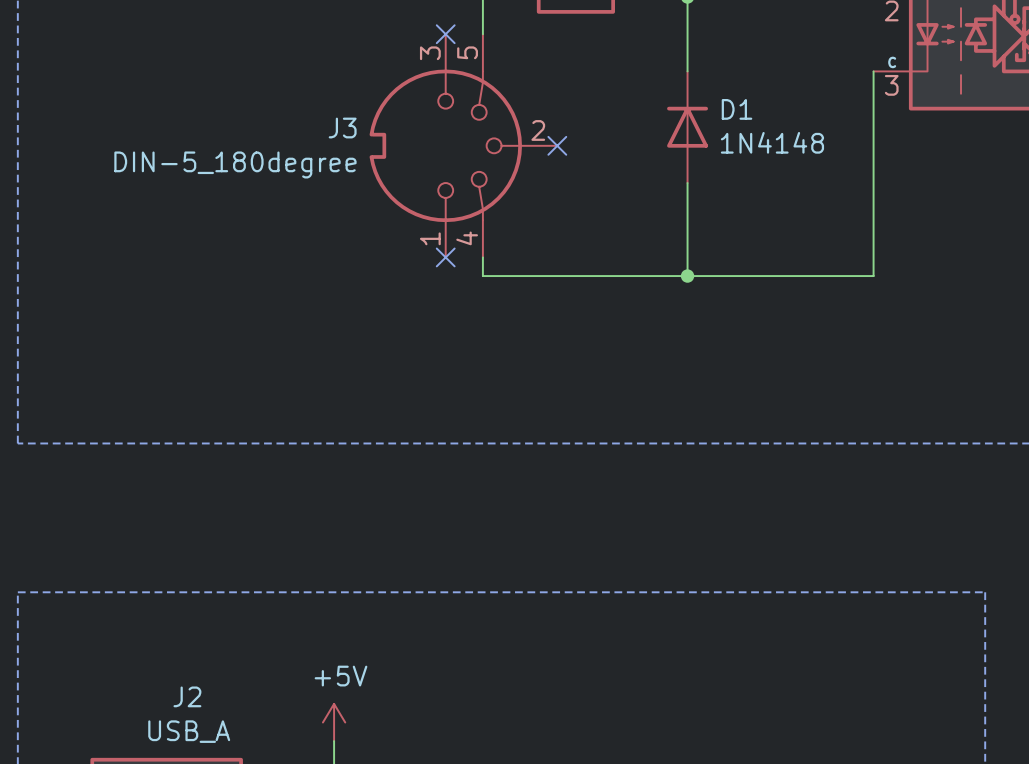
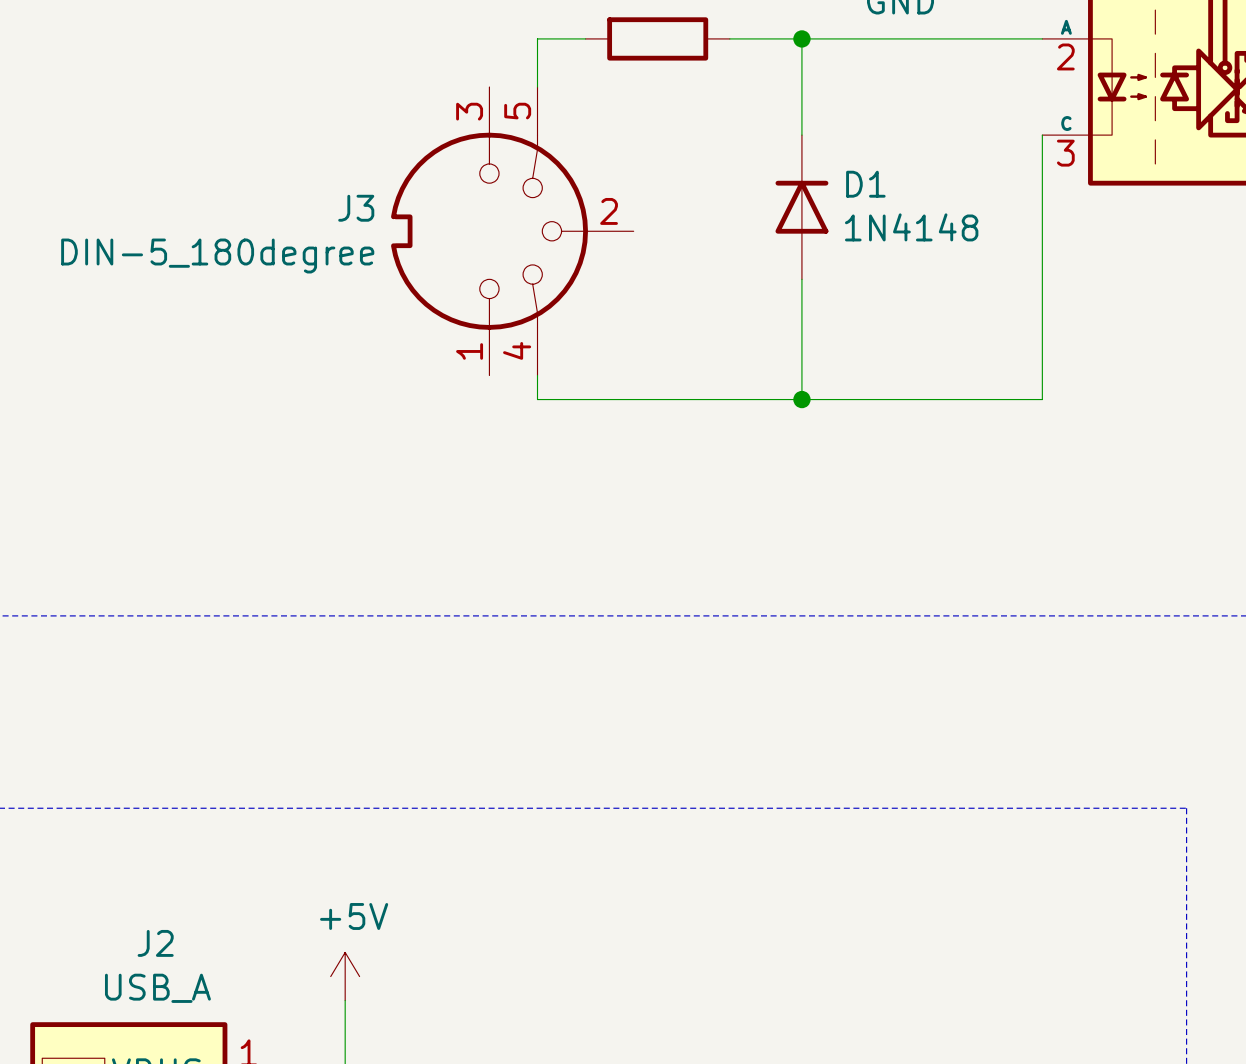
no-connect mark: (445, 34) -> none
no-connect mark: (557, 145) -> none
no-connect mark: (445, 257) -> none

